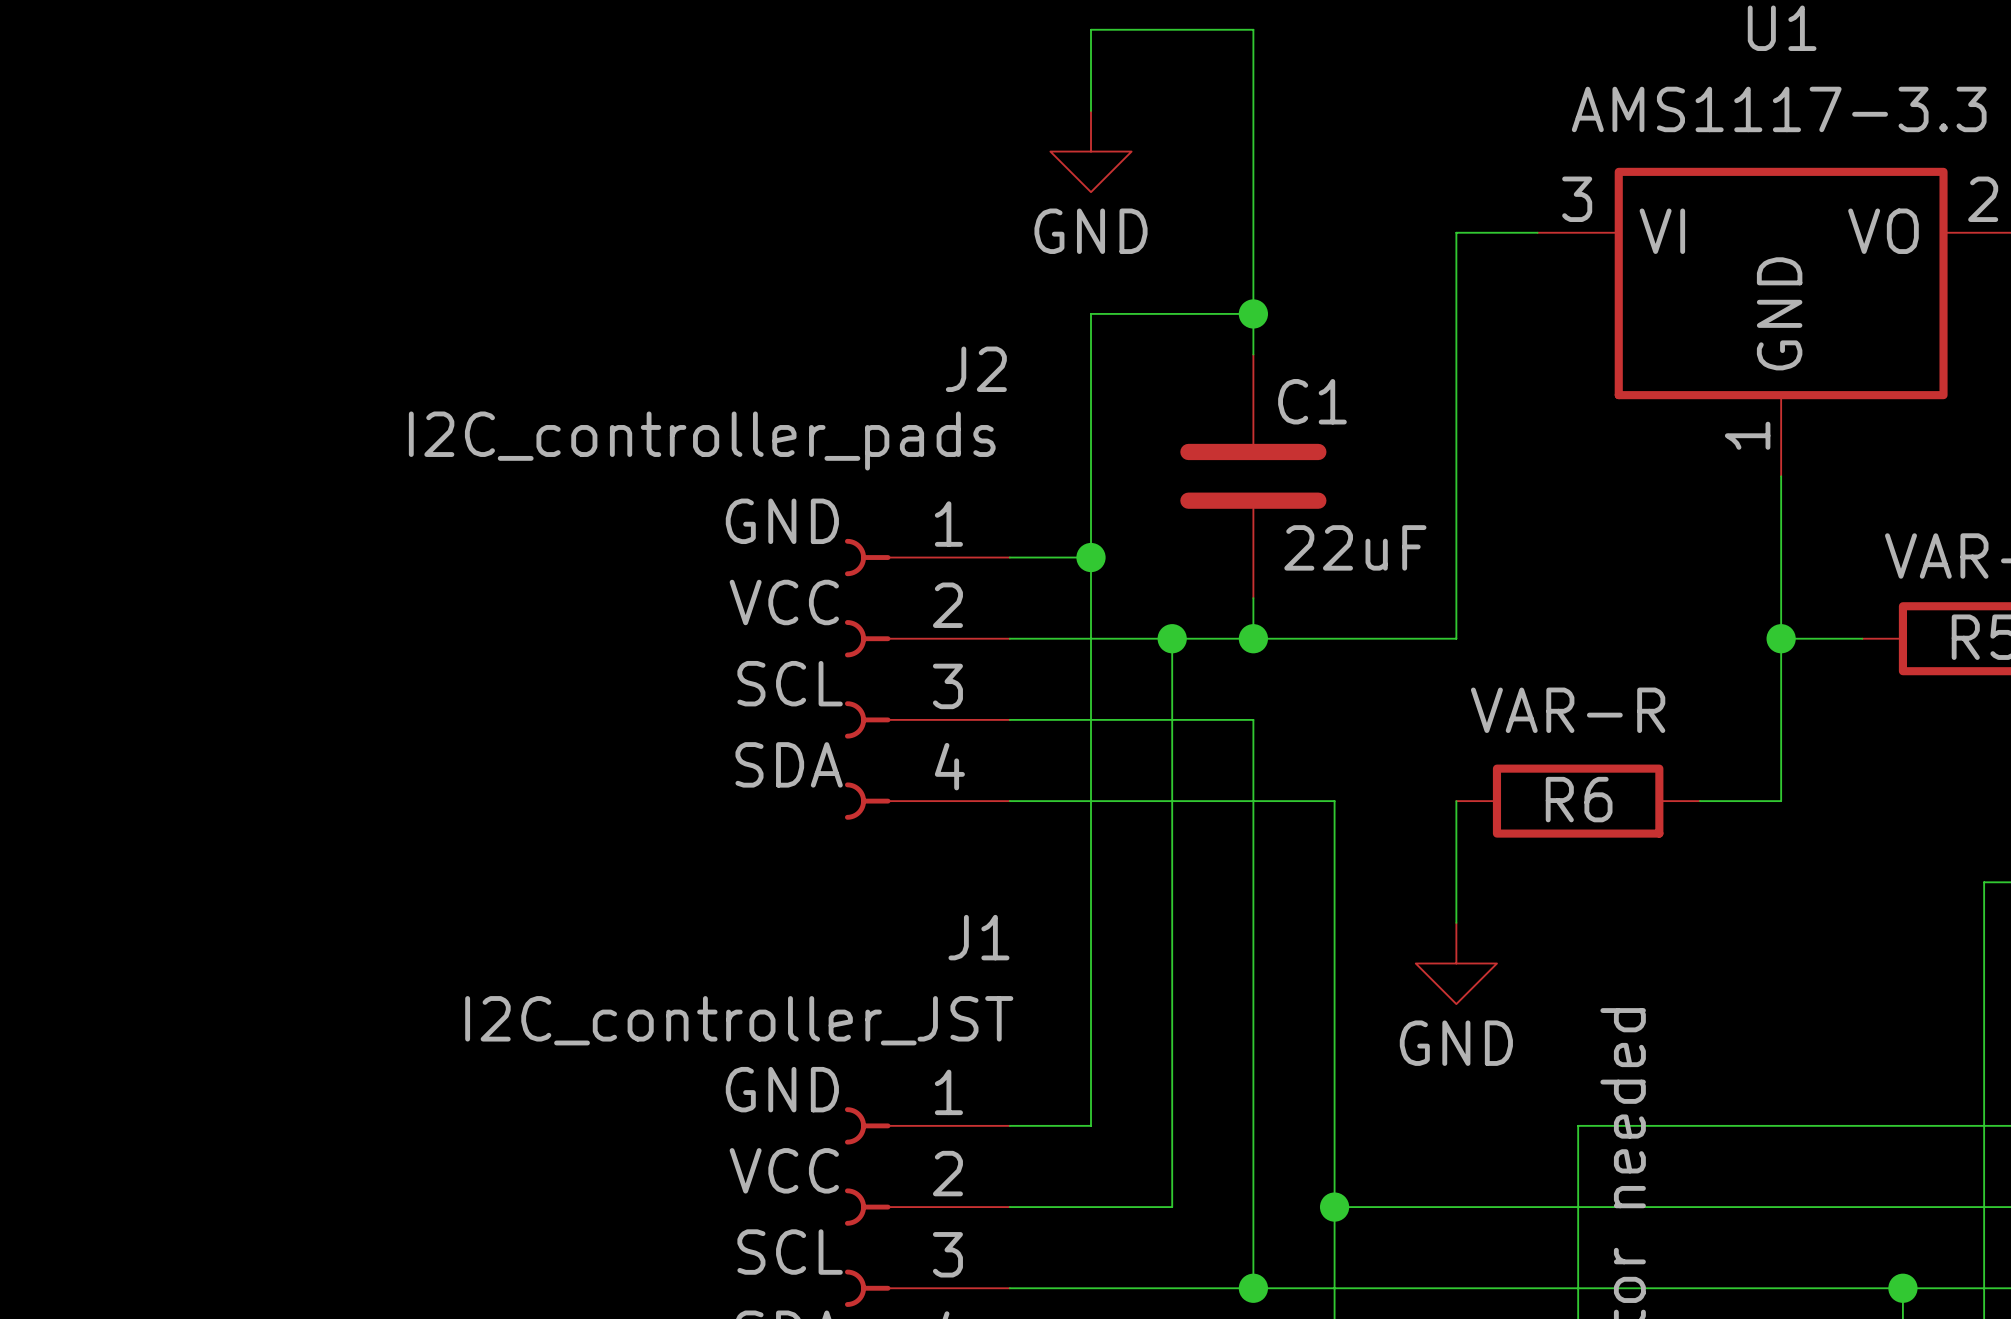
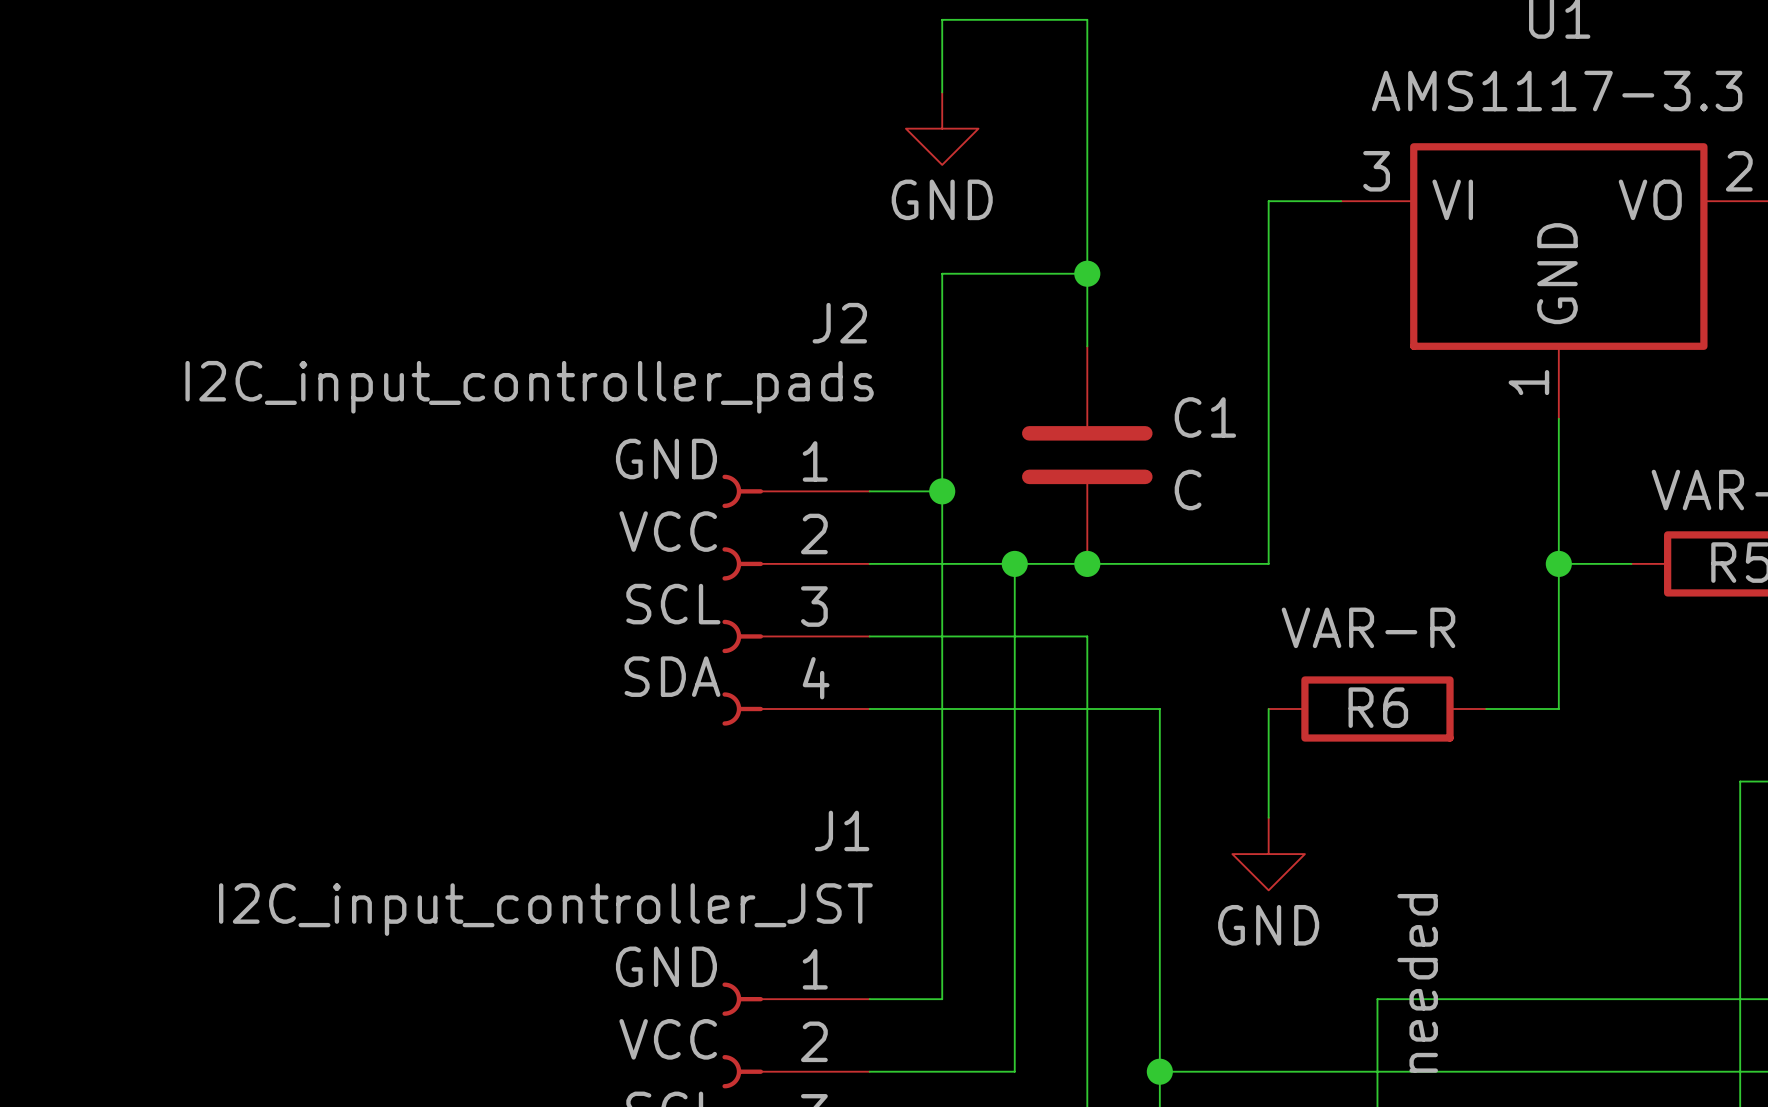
C1 name position: C1 (1312, 401) -> C1 (1205, 417)
J2 value: I2C_controller_pads (702, 440) -> I2C_input_controller_pads (529, 387)
C1 position: (1253, 476) -> (1087, 455)
C1 value: 22uF (1355, 547) -> C (1188, 490)
J1 value: I2C_controller_JST (739, 1020) -> I2C_input_controller_JST (545, 909)

